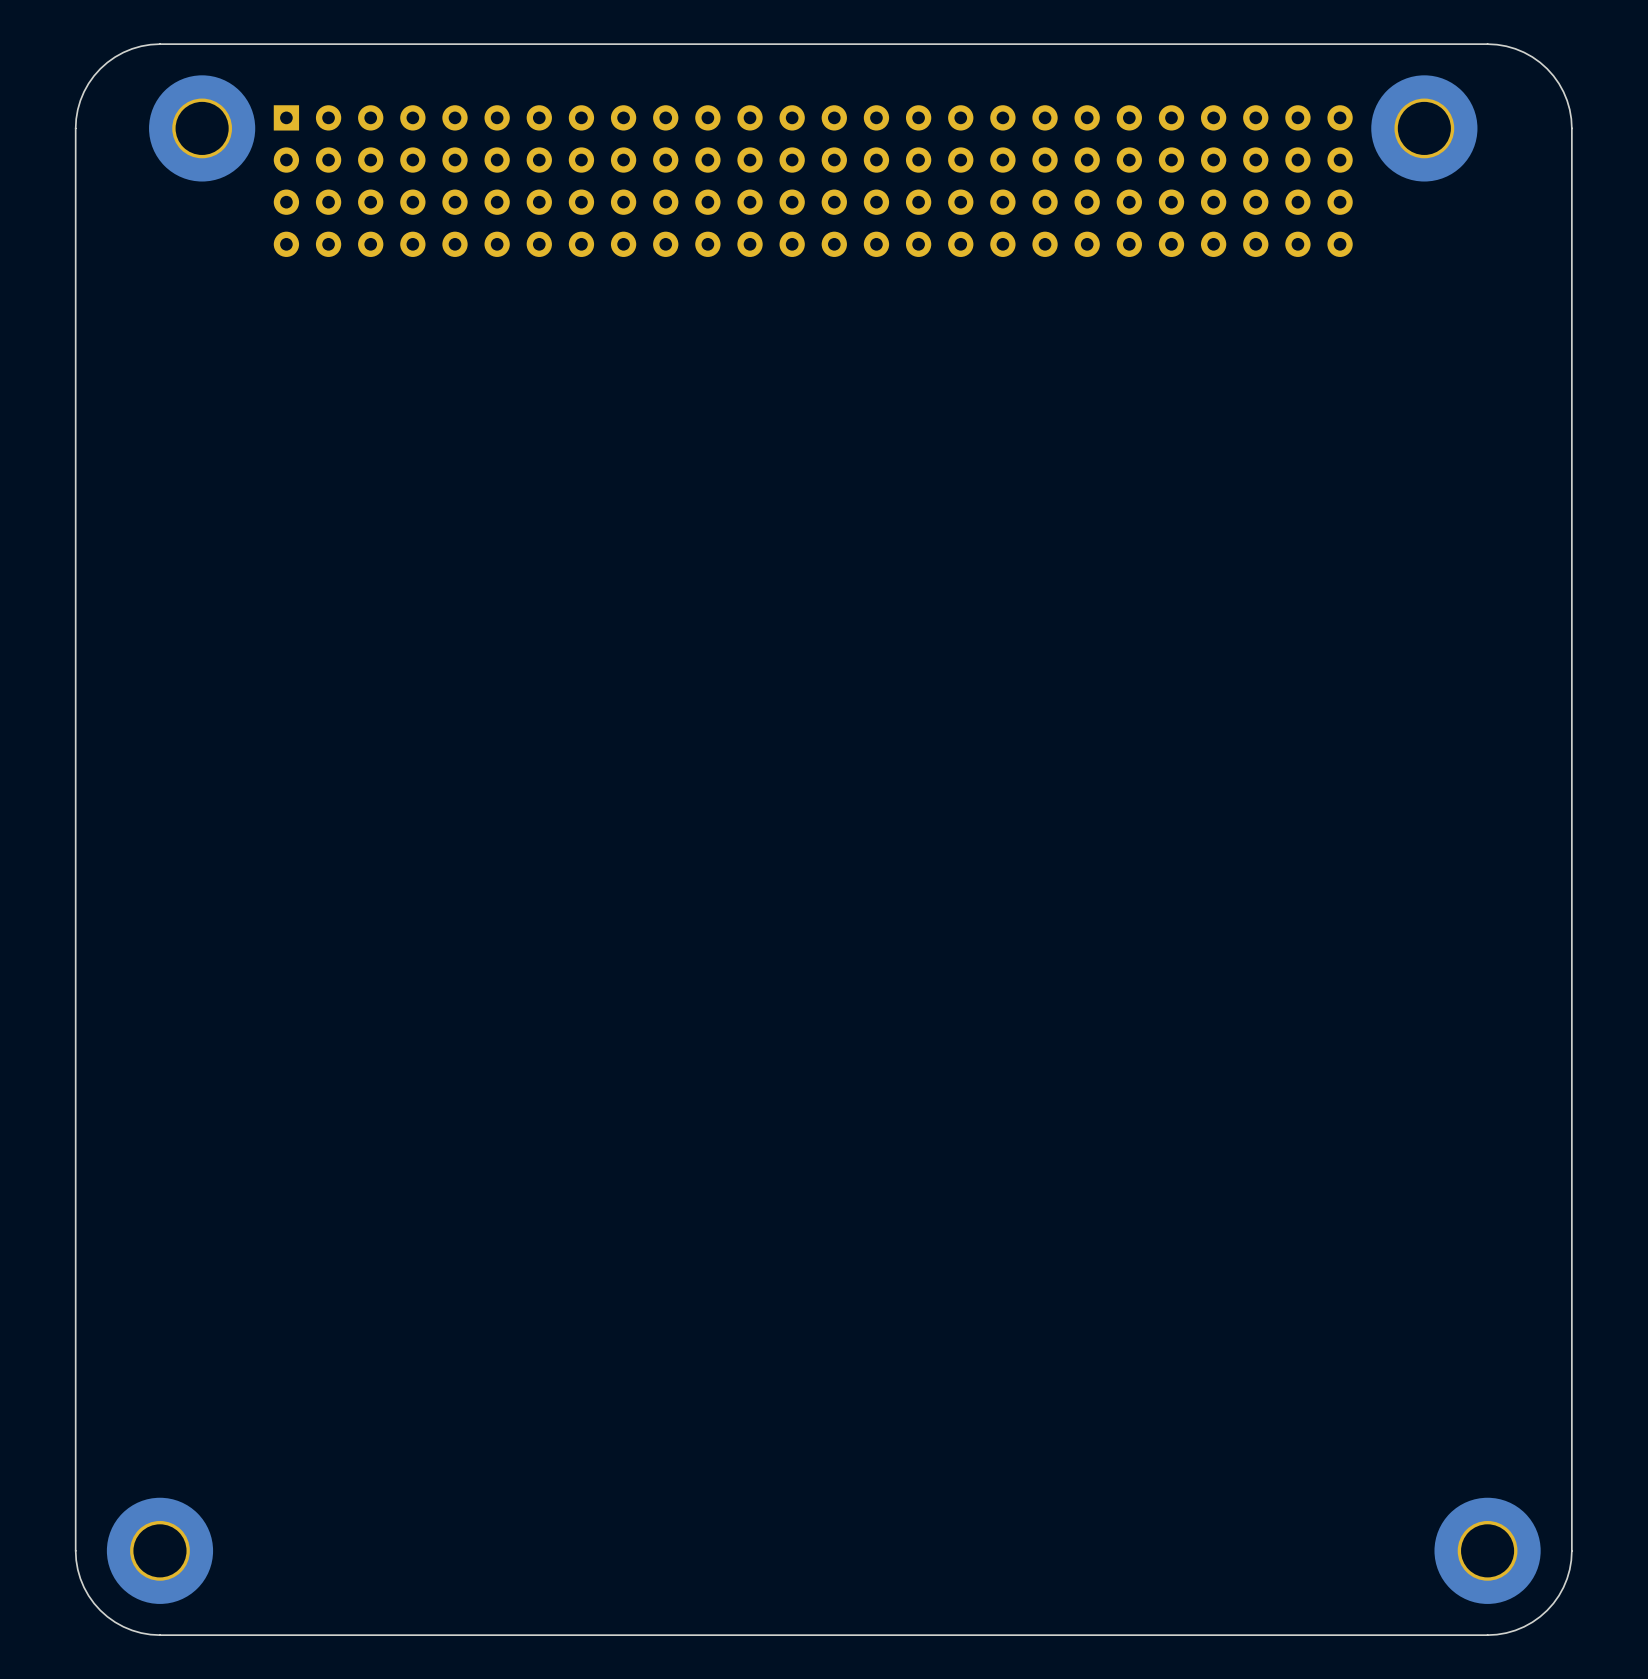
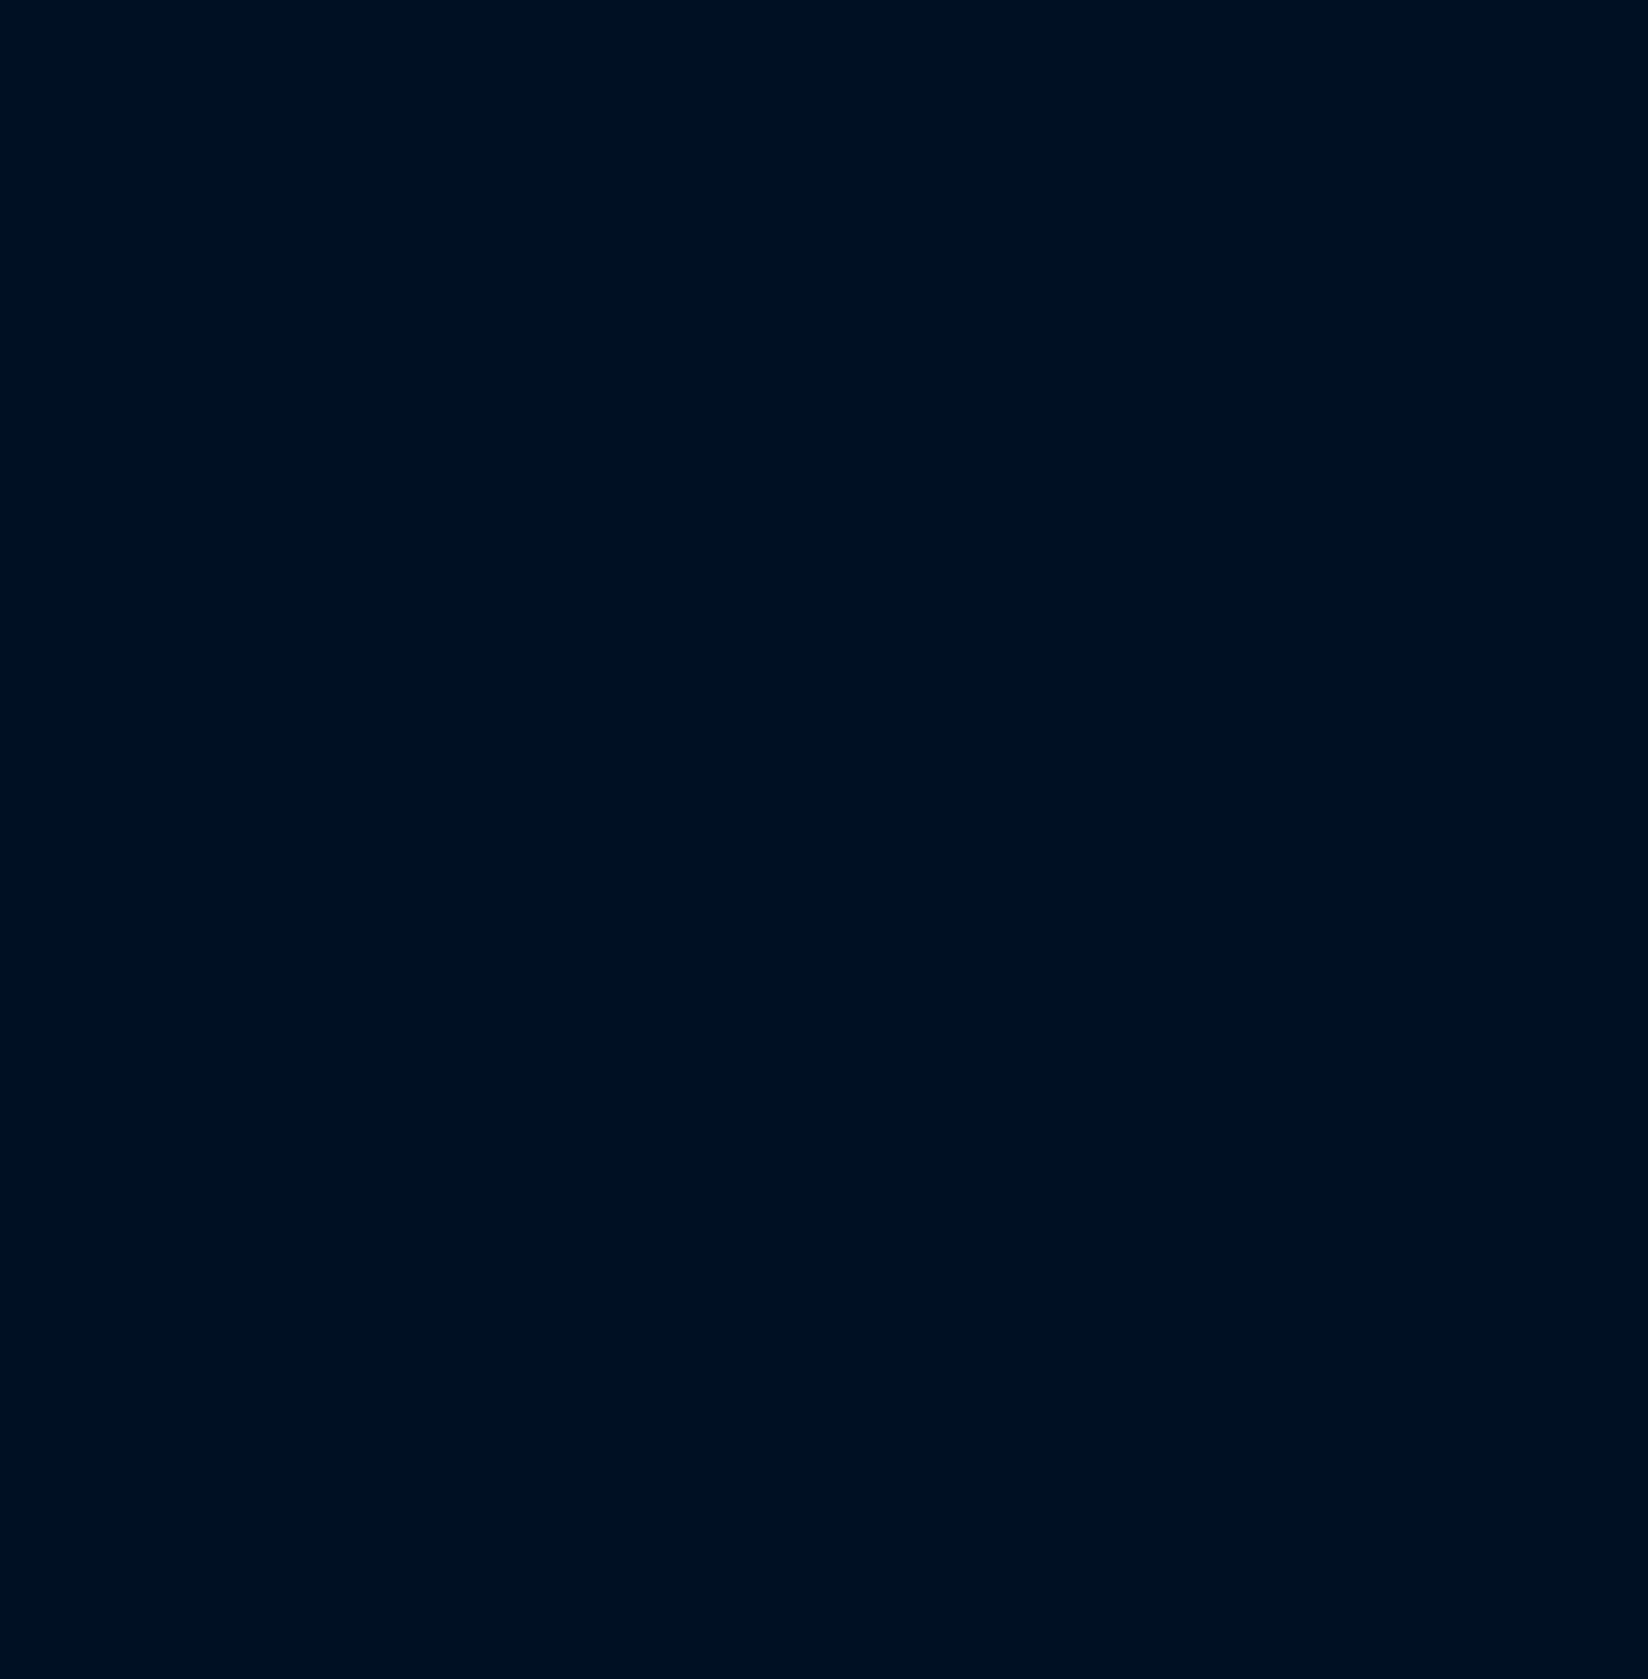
board edge: (1487, 44) (159, 44) (141, 46) (123, 52) (107, 62) (94, 75) (80, 100) (75, 128) (75, 1550) (77, 1569) (84, 1587) (94, 1603) (107, 1616) (132, 1630) (159, 1635) (1487, 1635) (1506, 1633) (1524, 1626) (1540, 1616) (1553, 1603) (1567, 1578) (1571, 1550) (1571, 128) (1569, 109) (1563, 91) (1547, 68) (1532, 57) (1515, 48) (1487, 44) -> none
part: (202, 128) -> none
part: (1424, 128) -> none
part: (813, 181) -> none
part: (159, 1550) -> none
part: (1487, 1550) -> none

